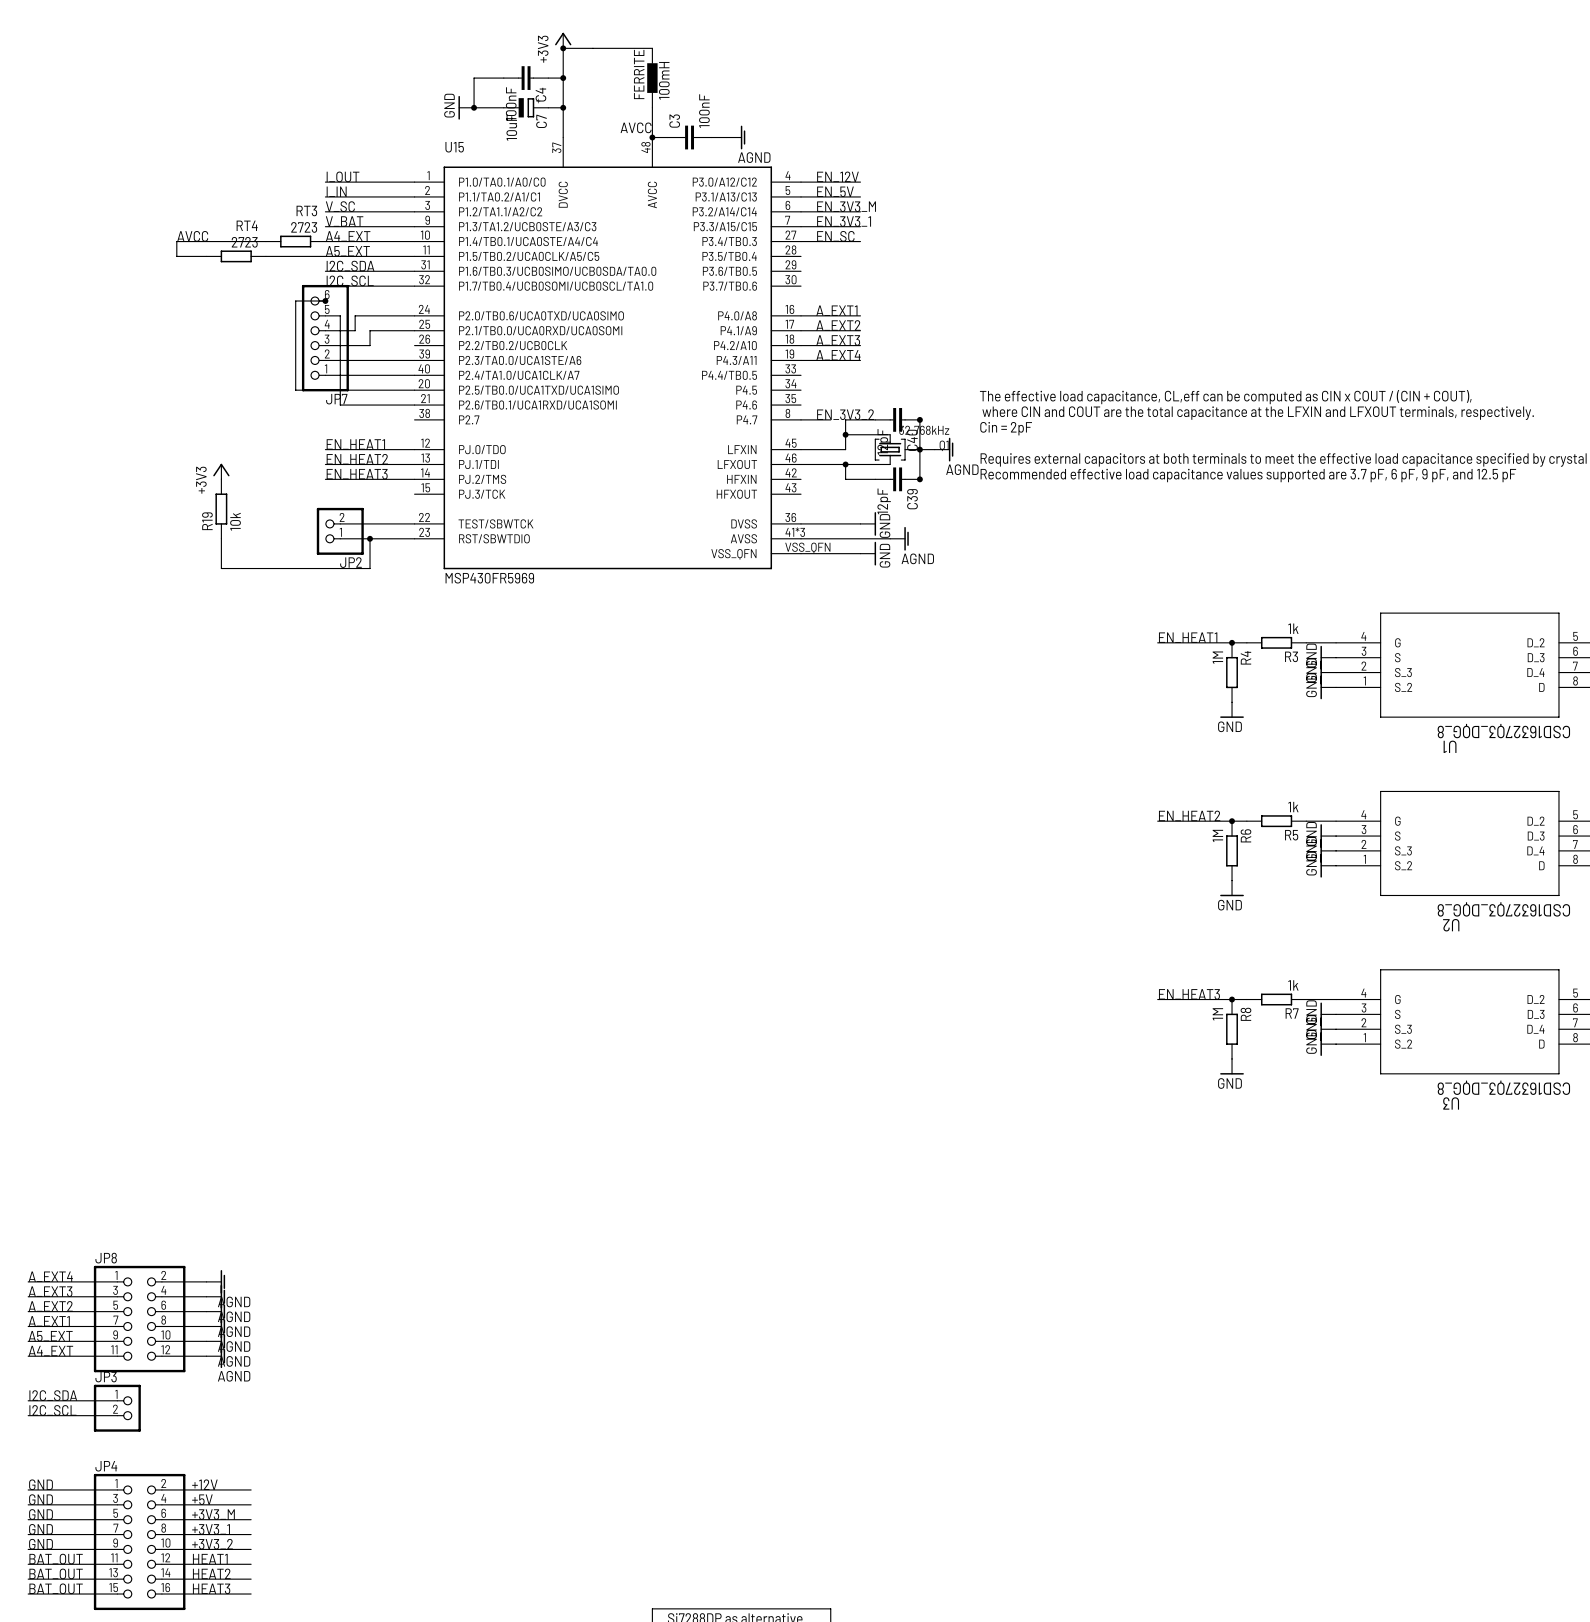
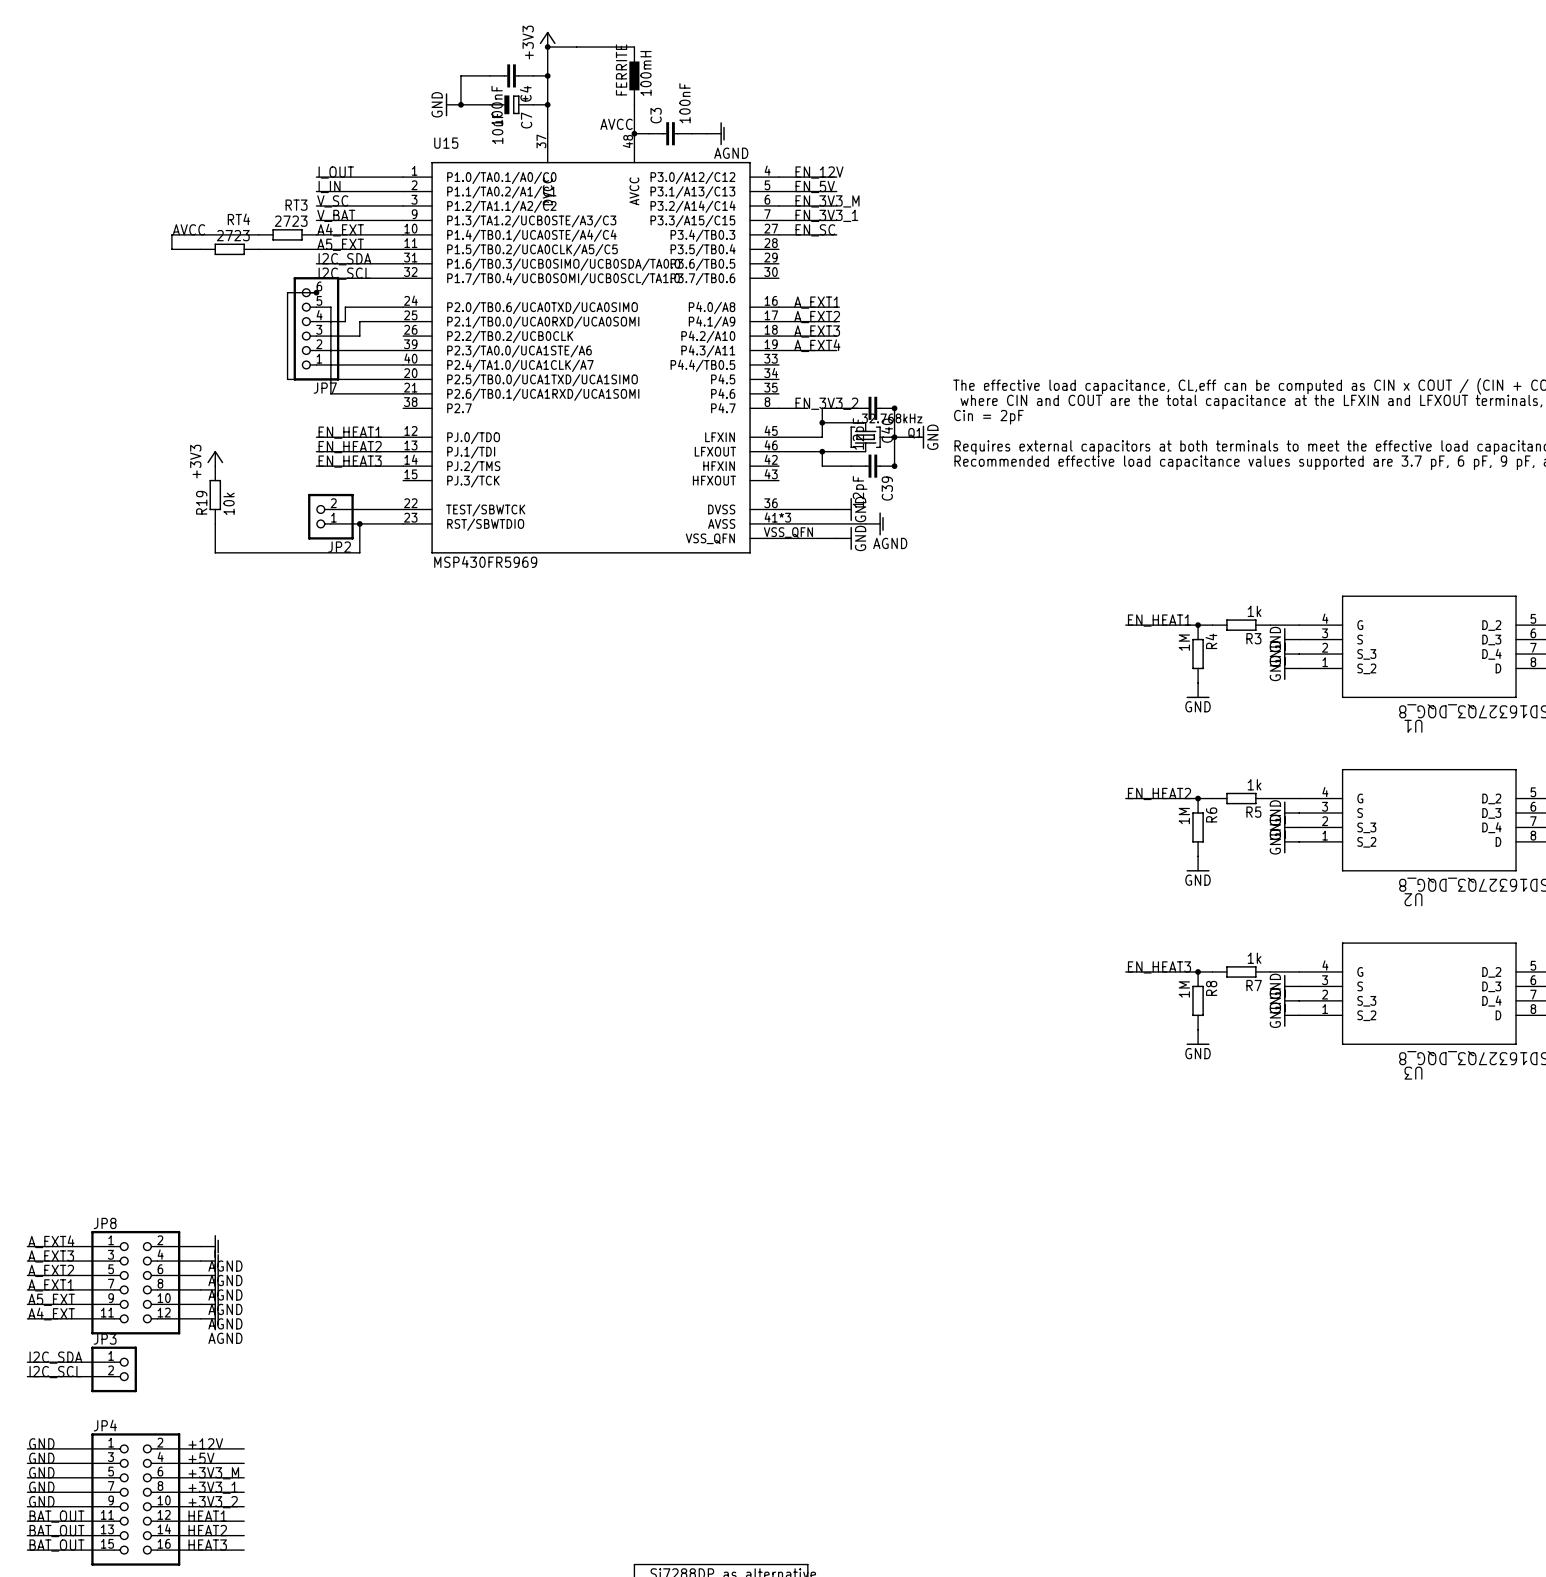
power symbol: AGND (944, 449) -> GND (916, 437)

